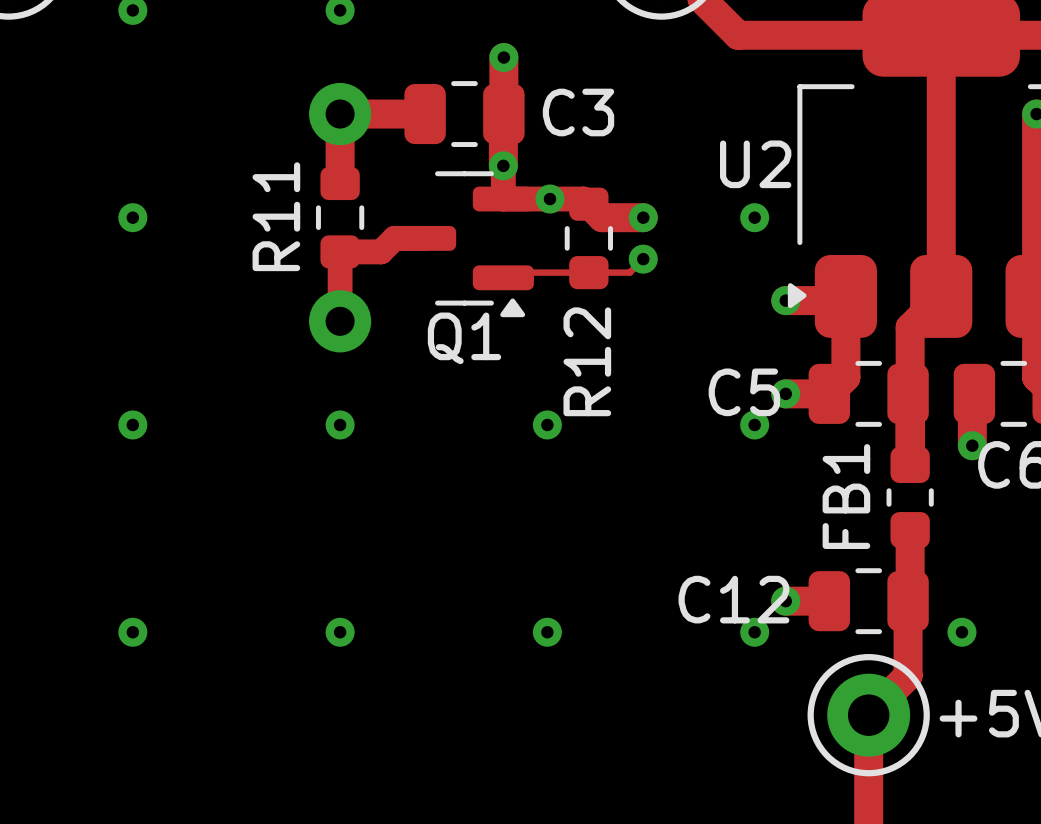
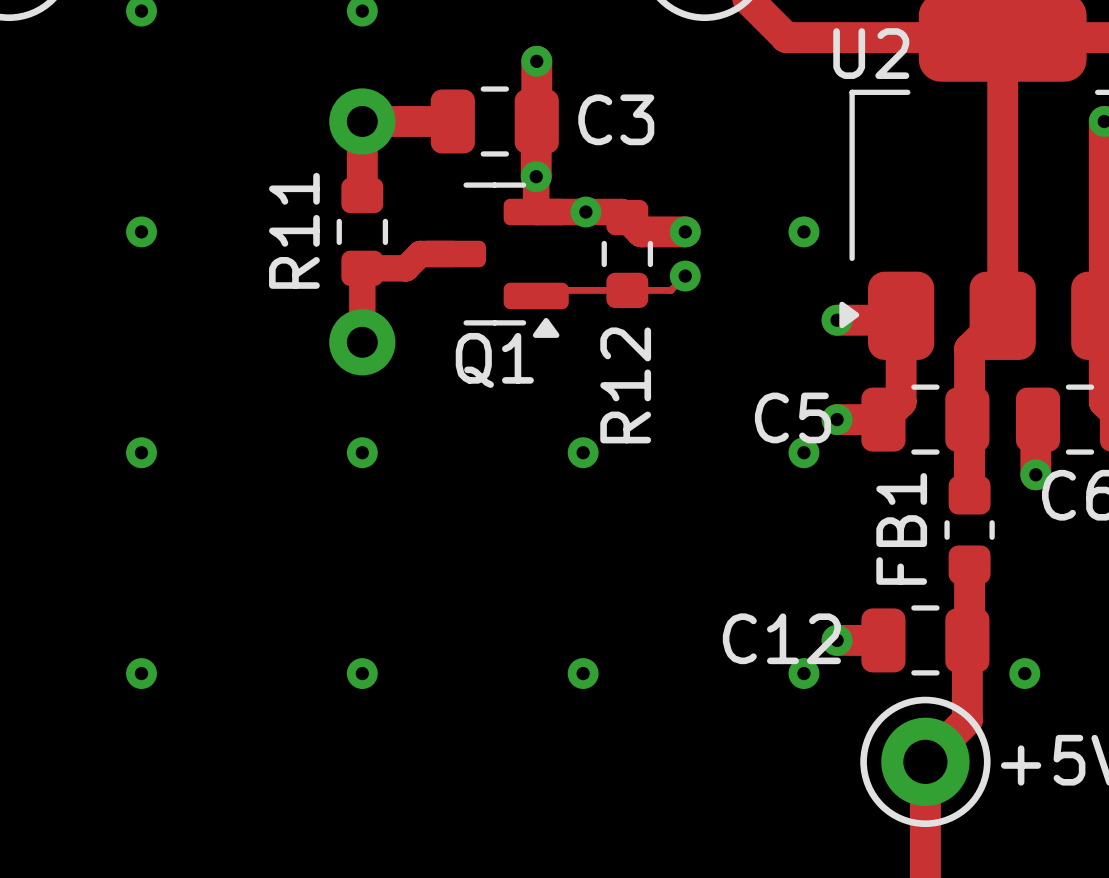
U2 name position: U2 (755, 164) -> U2 (871, 53)

